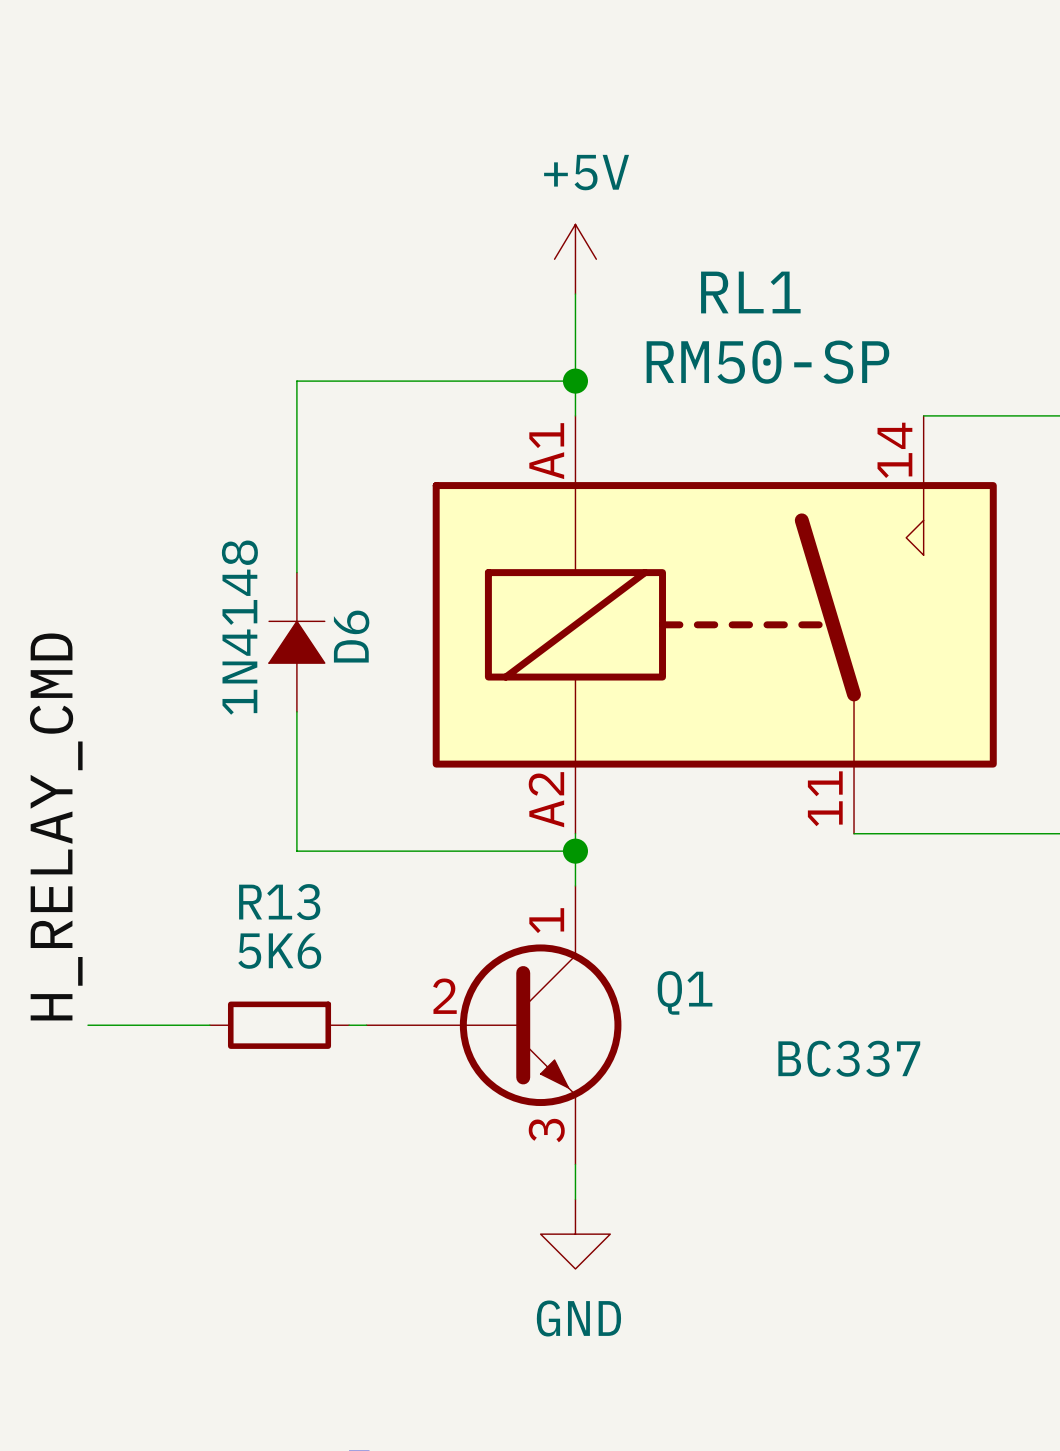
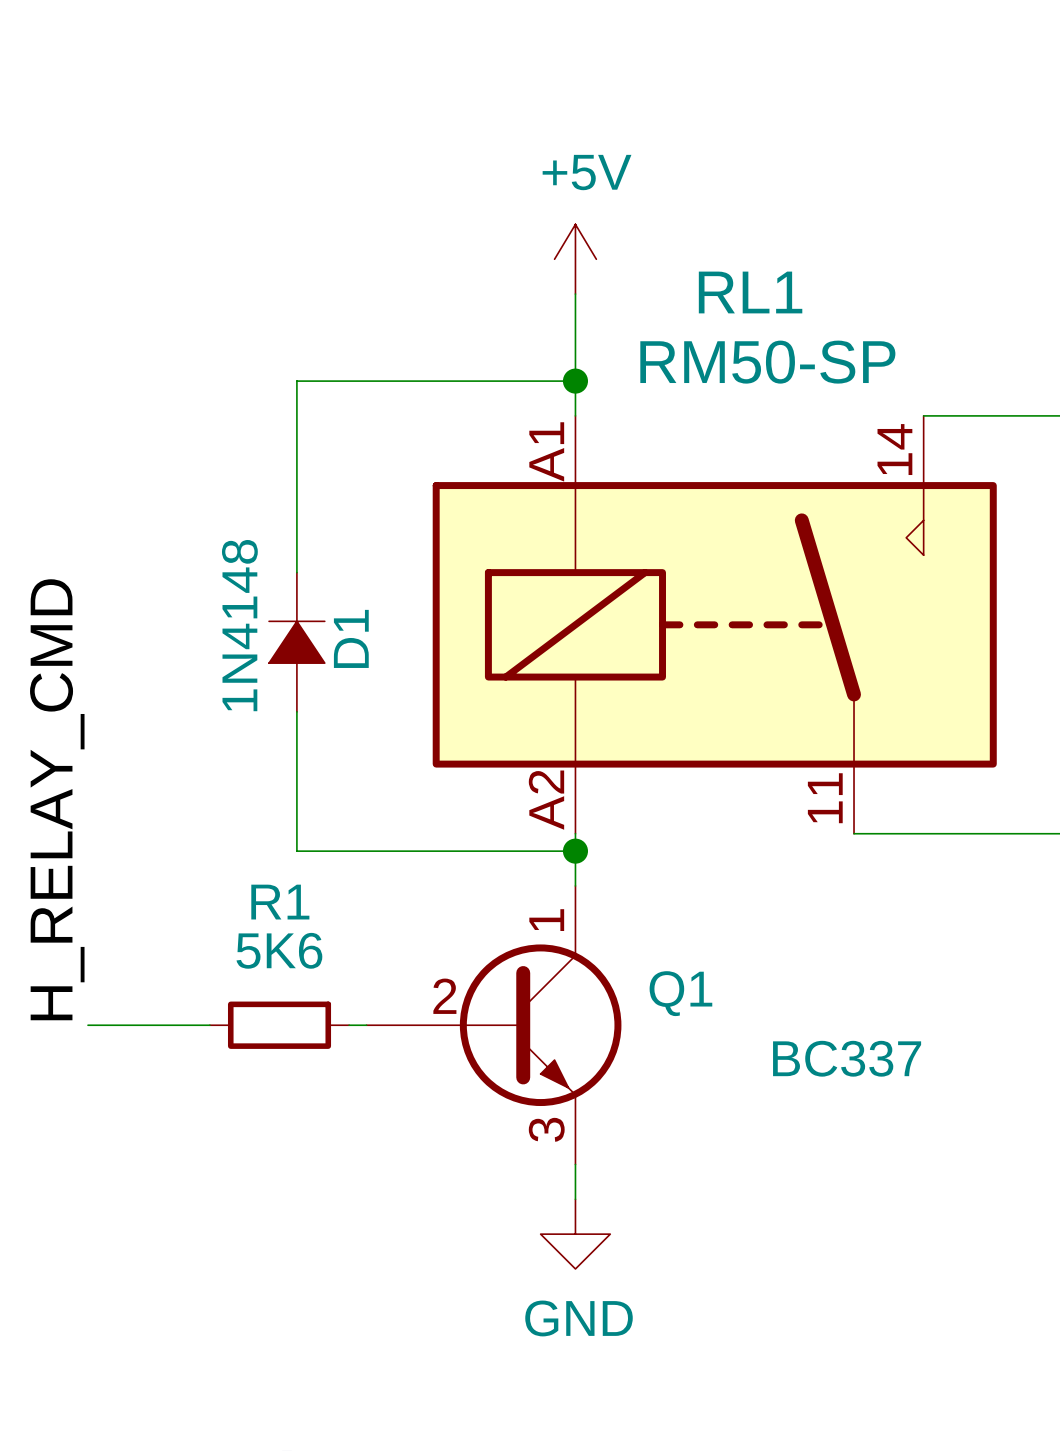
D6 name: D6 (351, 636) -> D1 (351, 638)
R13 name: R13 (279, 902) -> R1 (280, 902)

